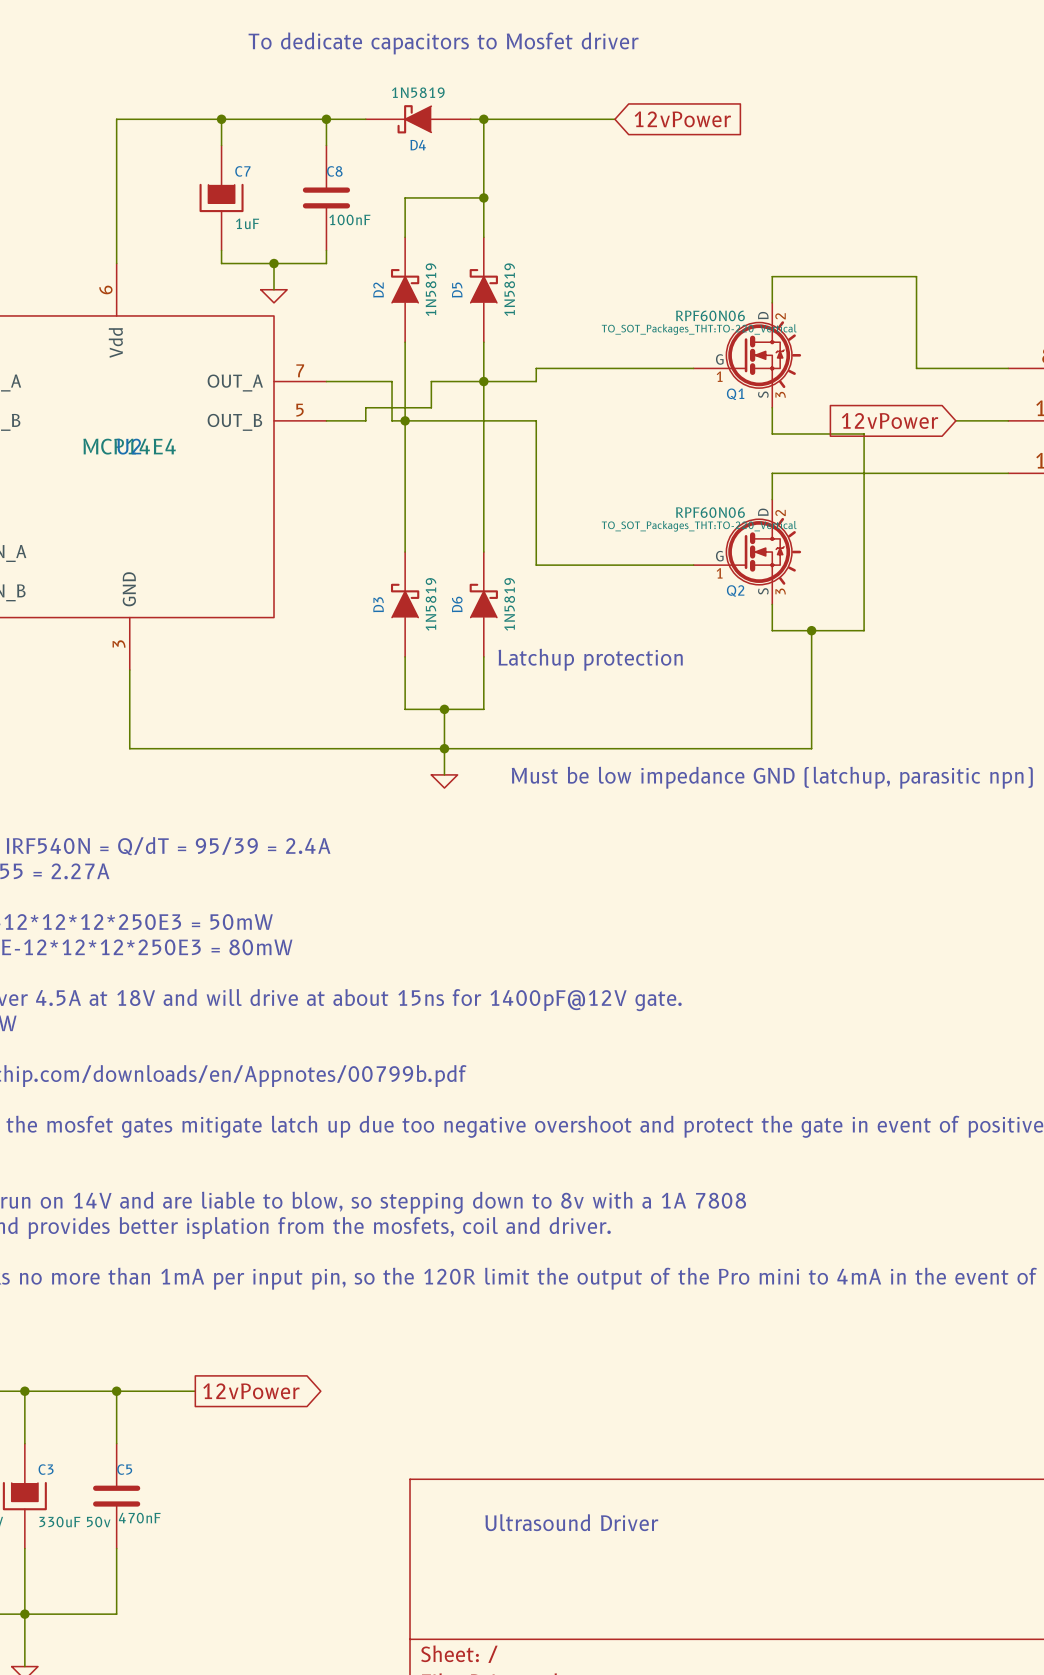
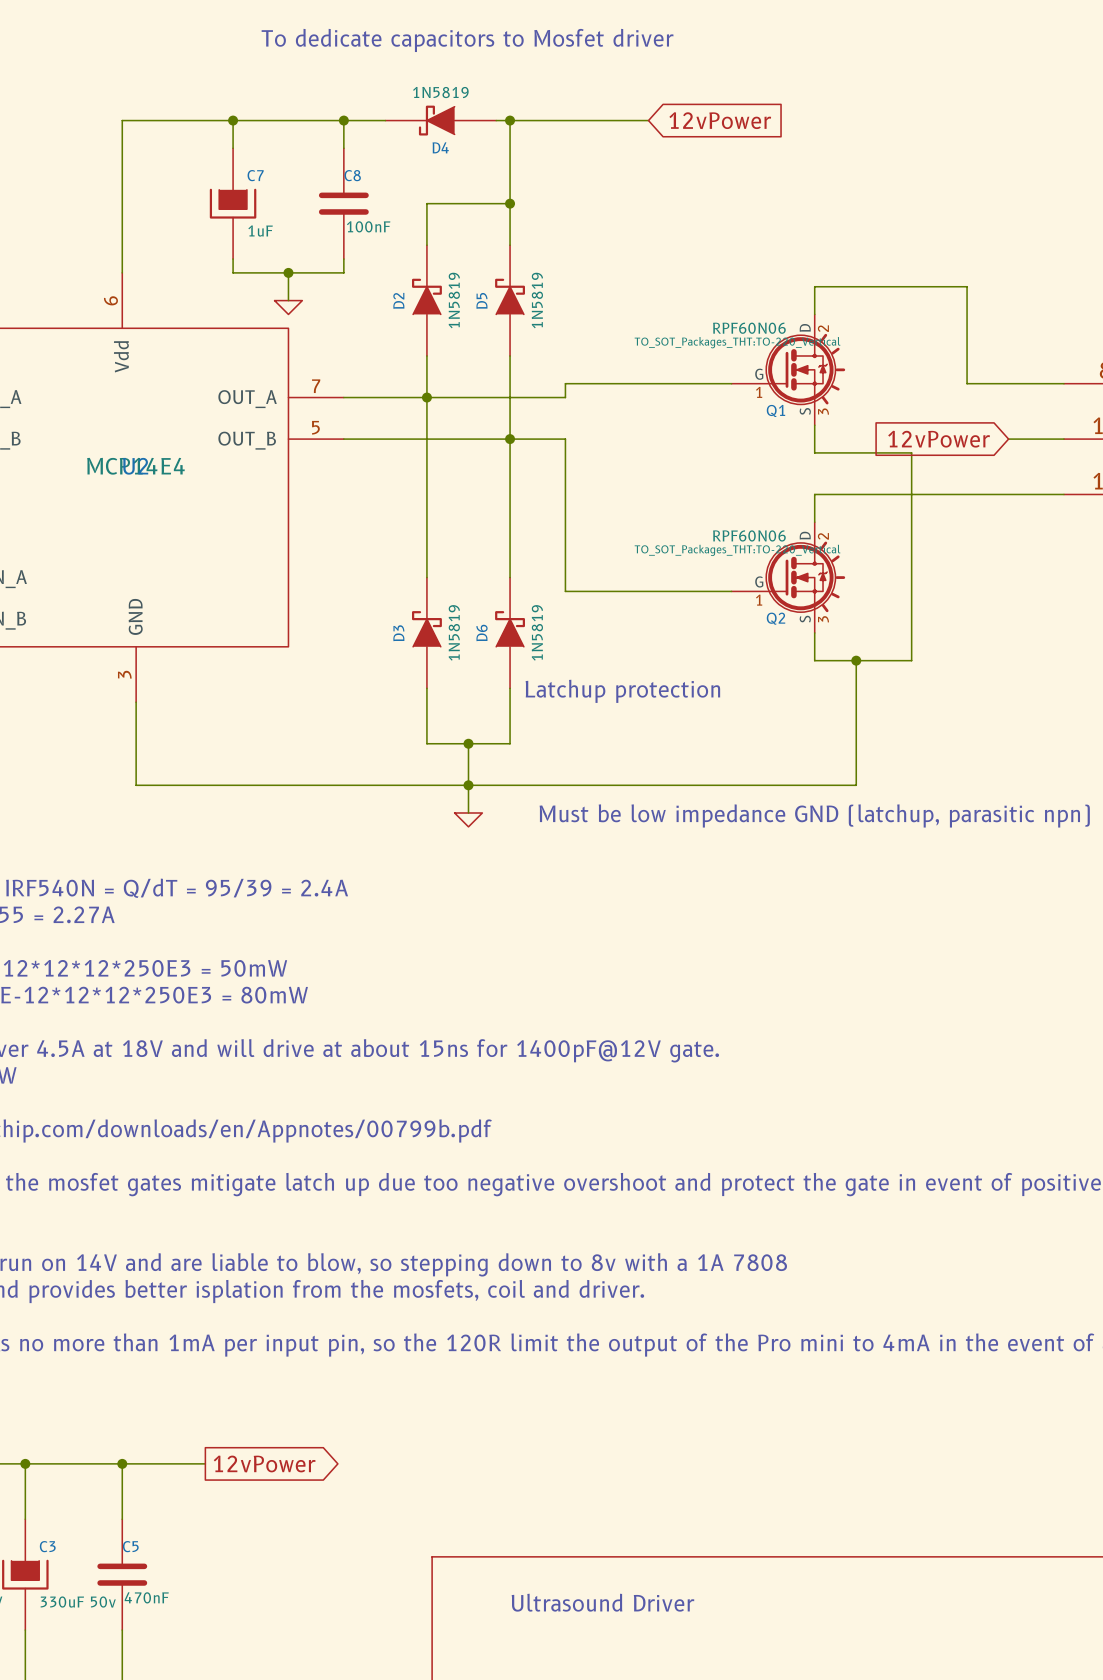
wire: (392, 381) (392, 420) -> (385, 439) (413, 439)
junction: none -> (426, 397)
wire: (431, 381) (431, 407) (365, 407) (365, 420) -> (454, 397) (413, 397)
junction: (483, 381) -> none
junction: (405, 420) -> none
junction: none -> (510, 439)

